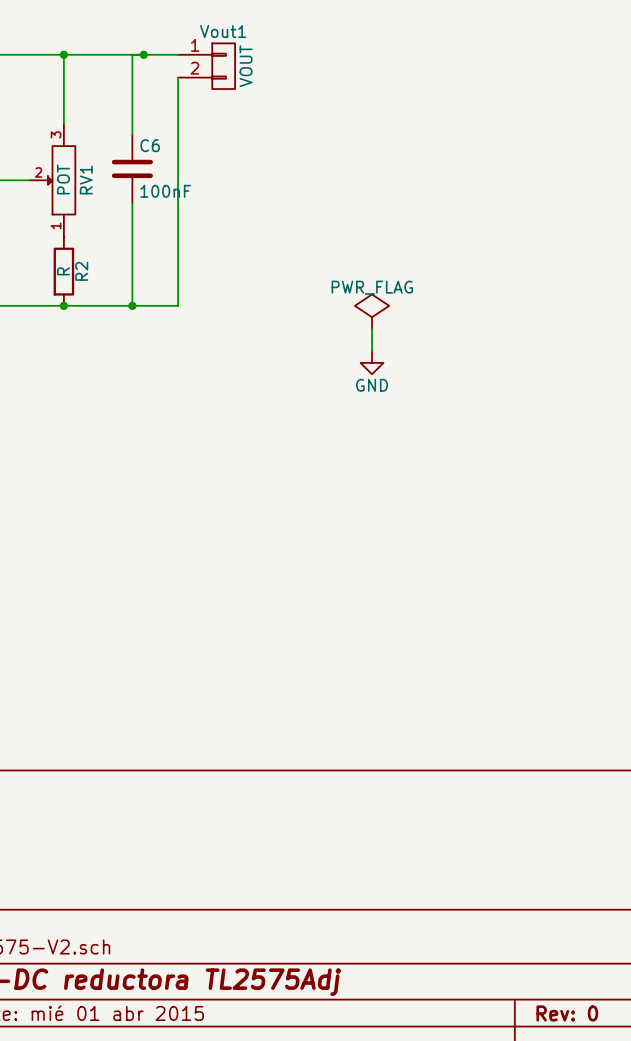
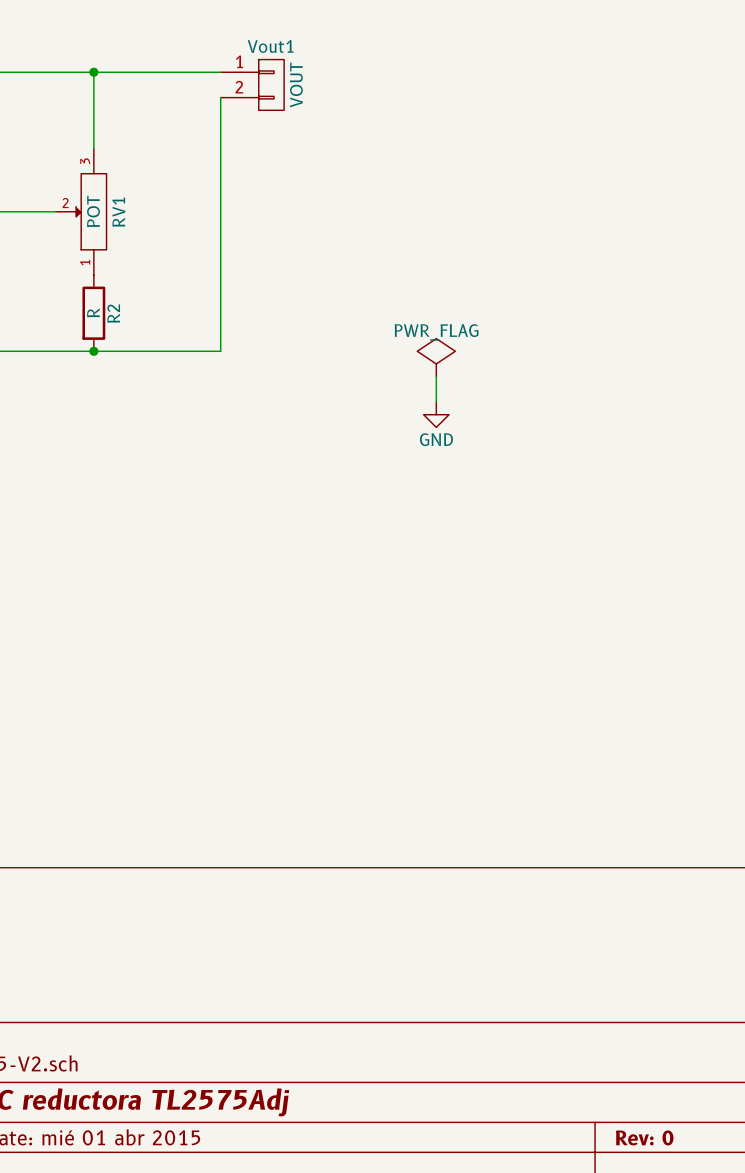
wire: (132, 54) (132, 134) -> none
junction: (143, 54) -> none
C6: 100nF (132, 168) -> none
wire: (132, 203) (132, 305) -> none
junction: (132, 305) -> none

